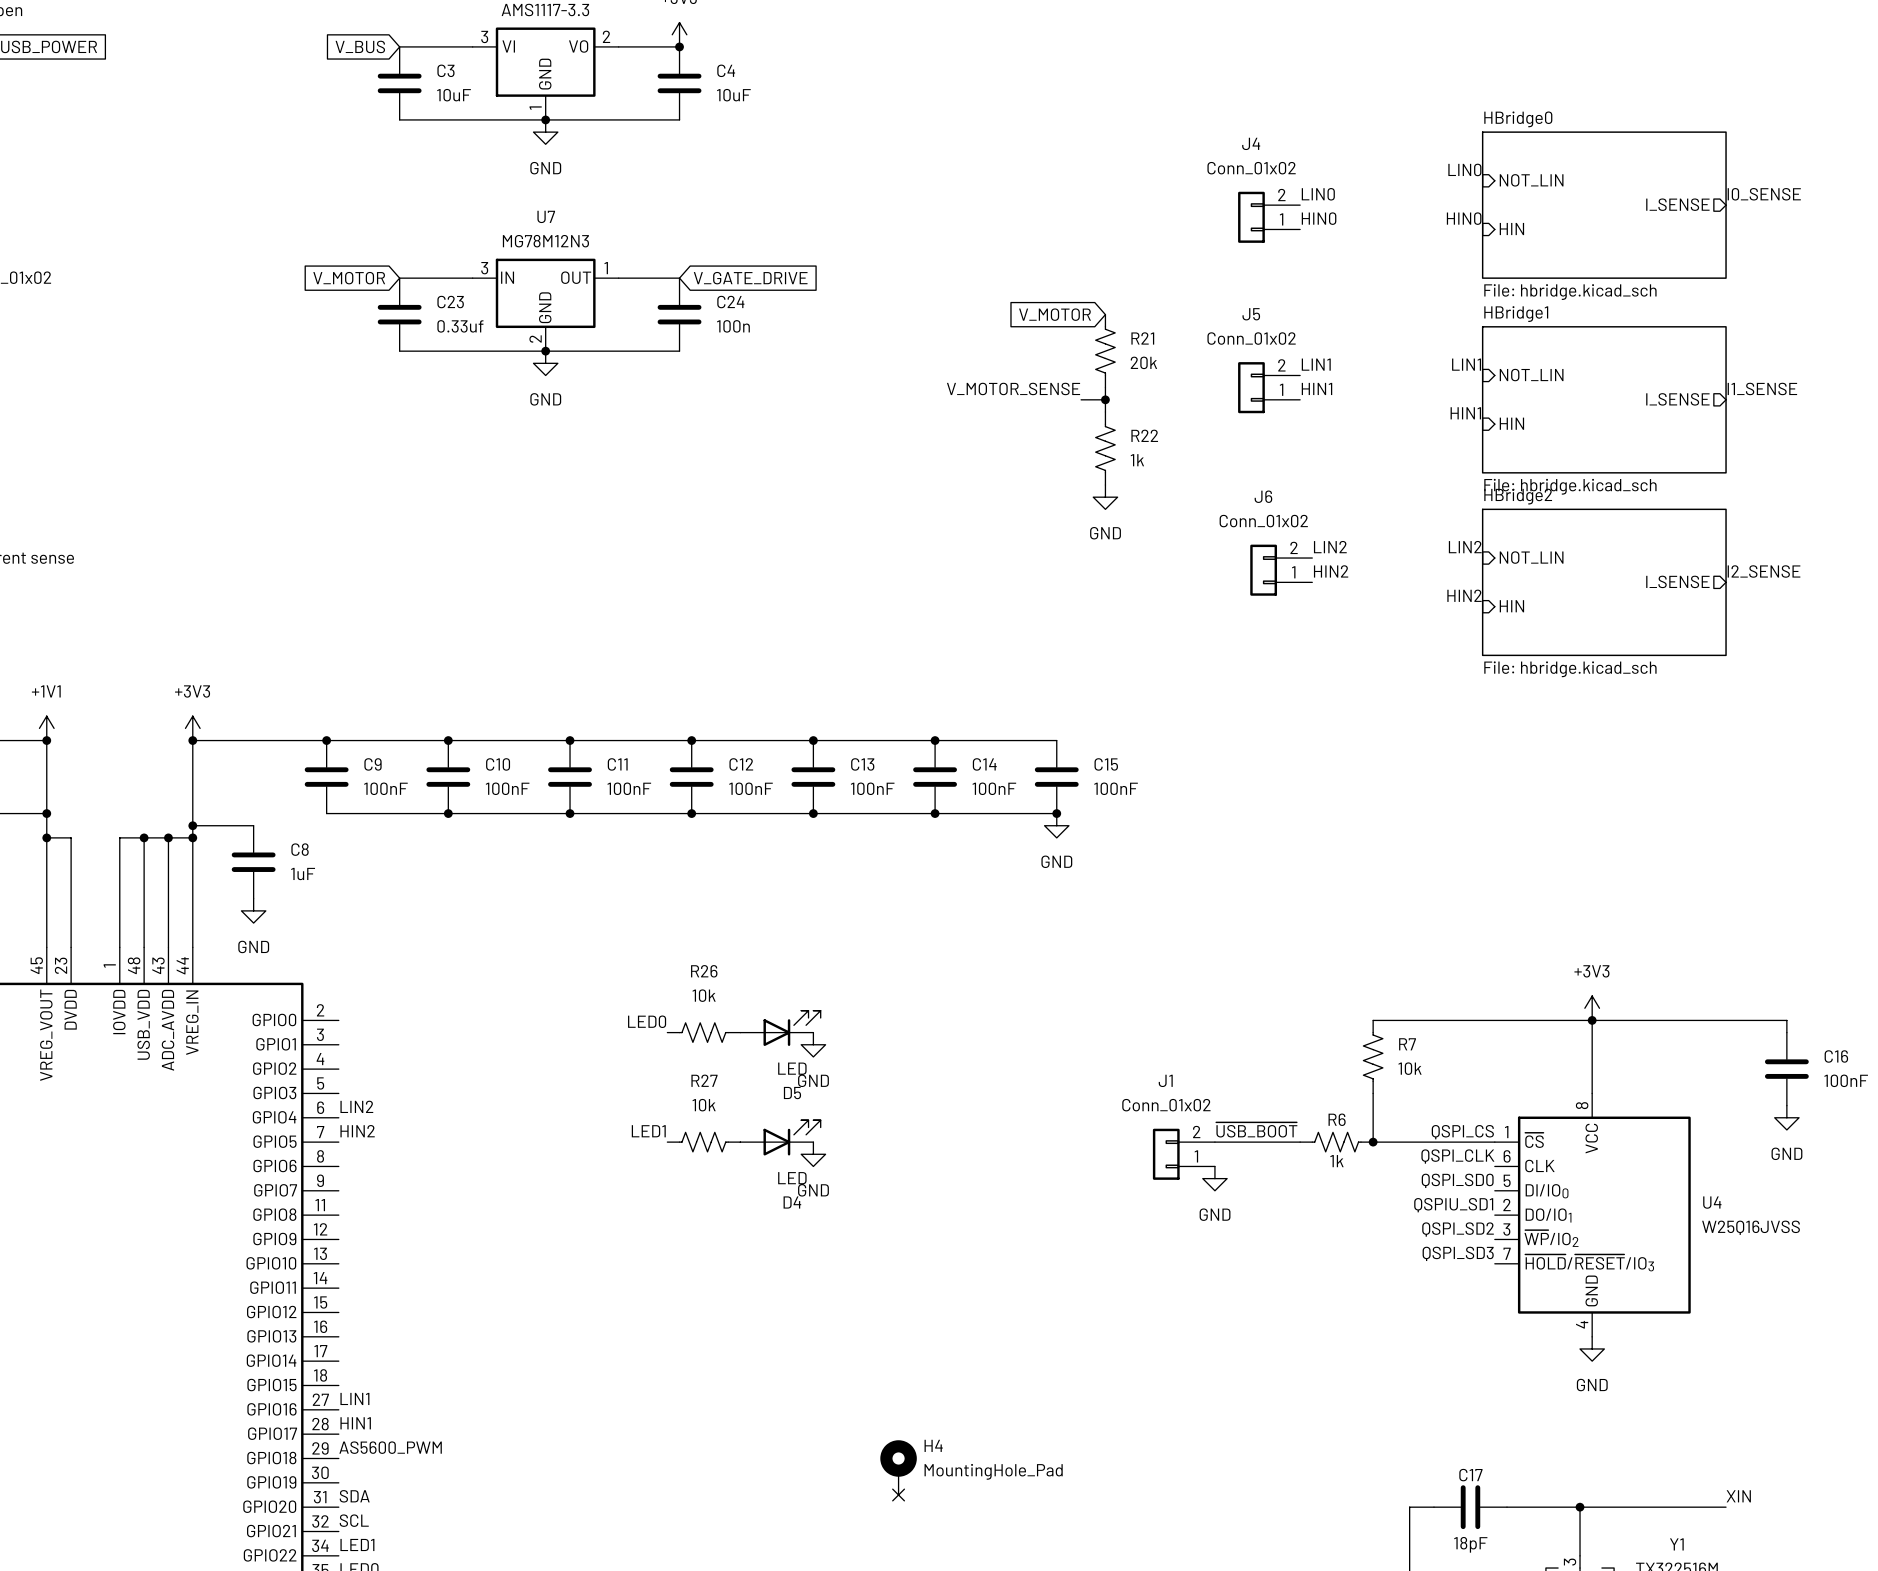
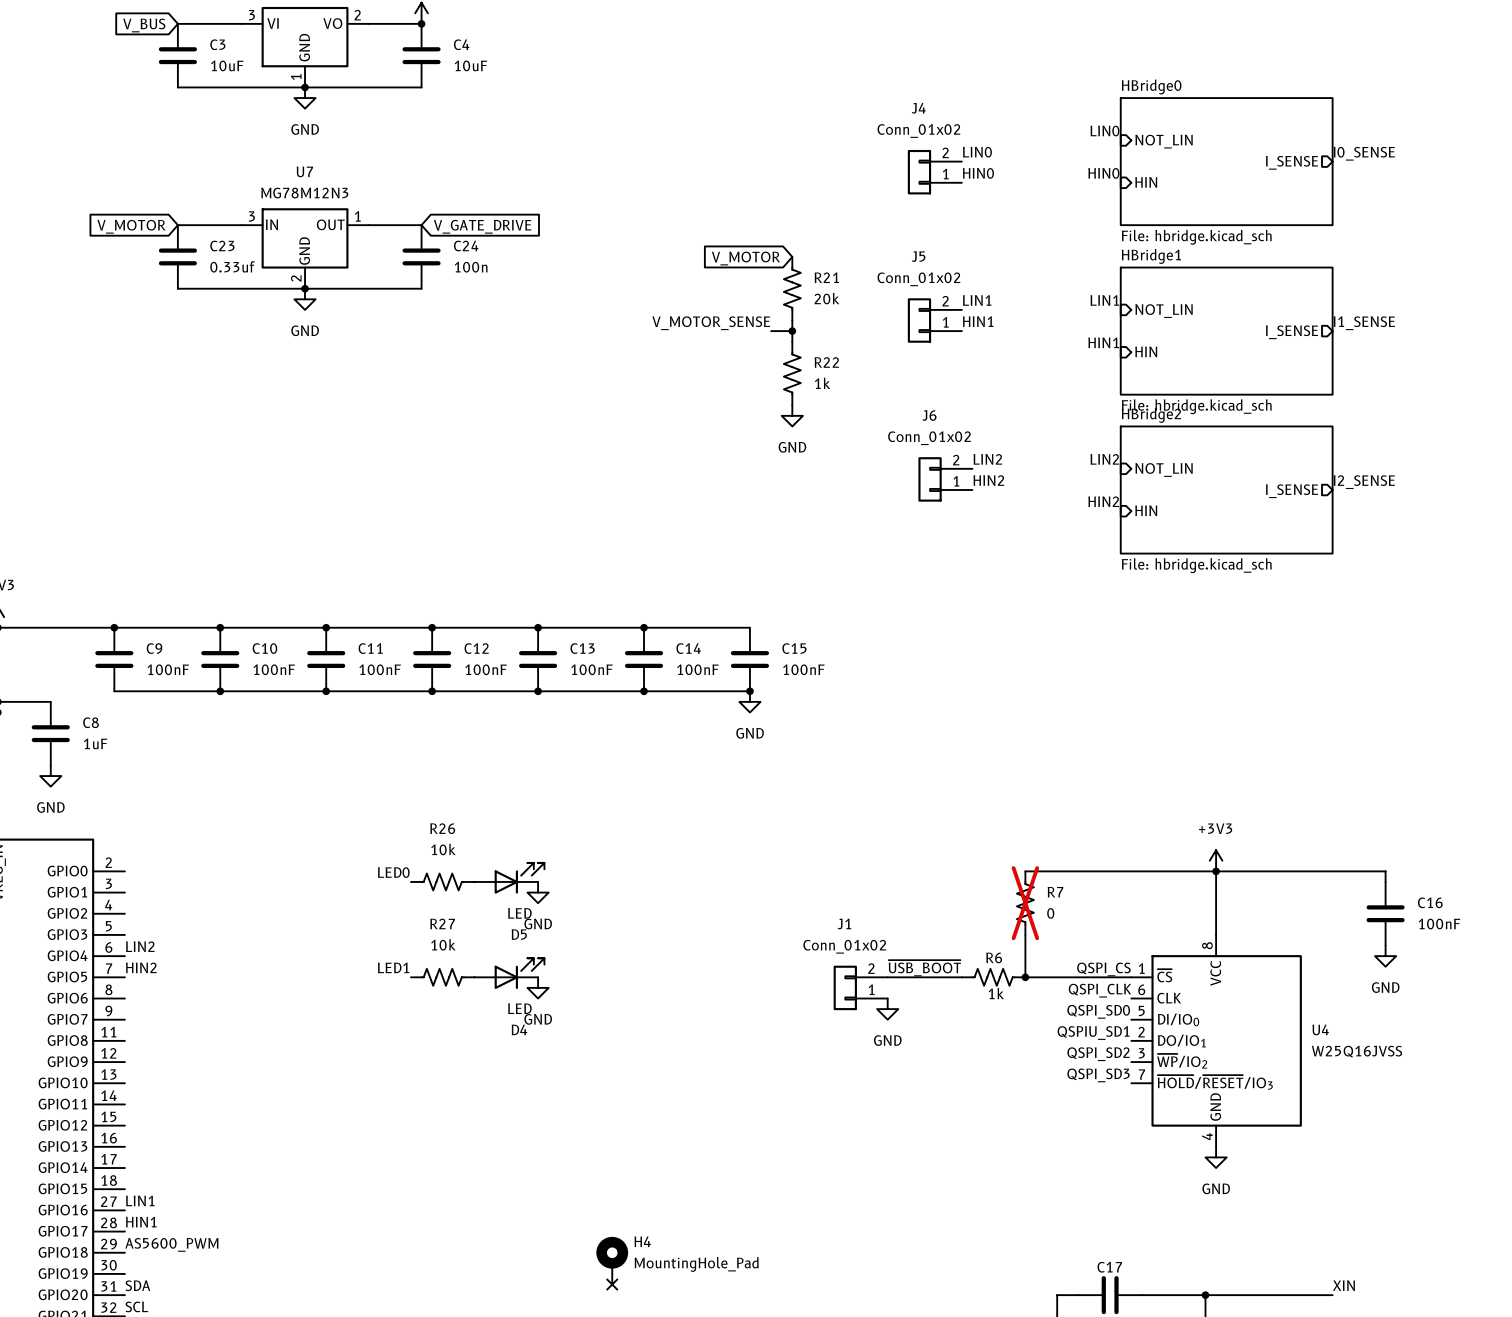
R7 do-not-place cross: none -> (1025, 903)
R7 value: 10k (1410, 1068) -> 0 (1050, 913)

